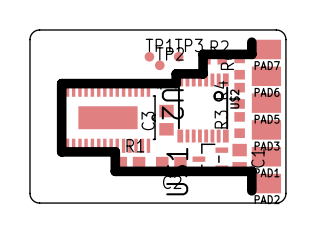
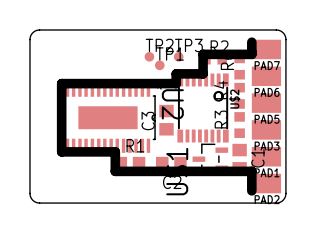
TP1 name: TP1 (159, 45) -> TP2 (159, 45)
TP2 name: TP2 (170, 53) -> TP1 (170, 53)

